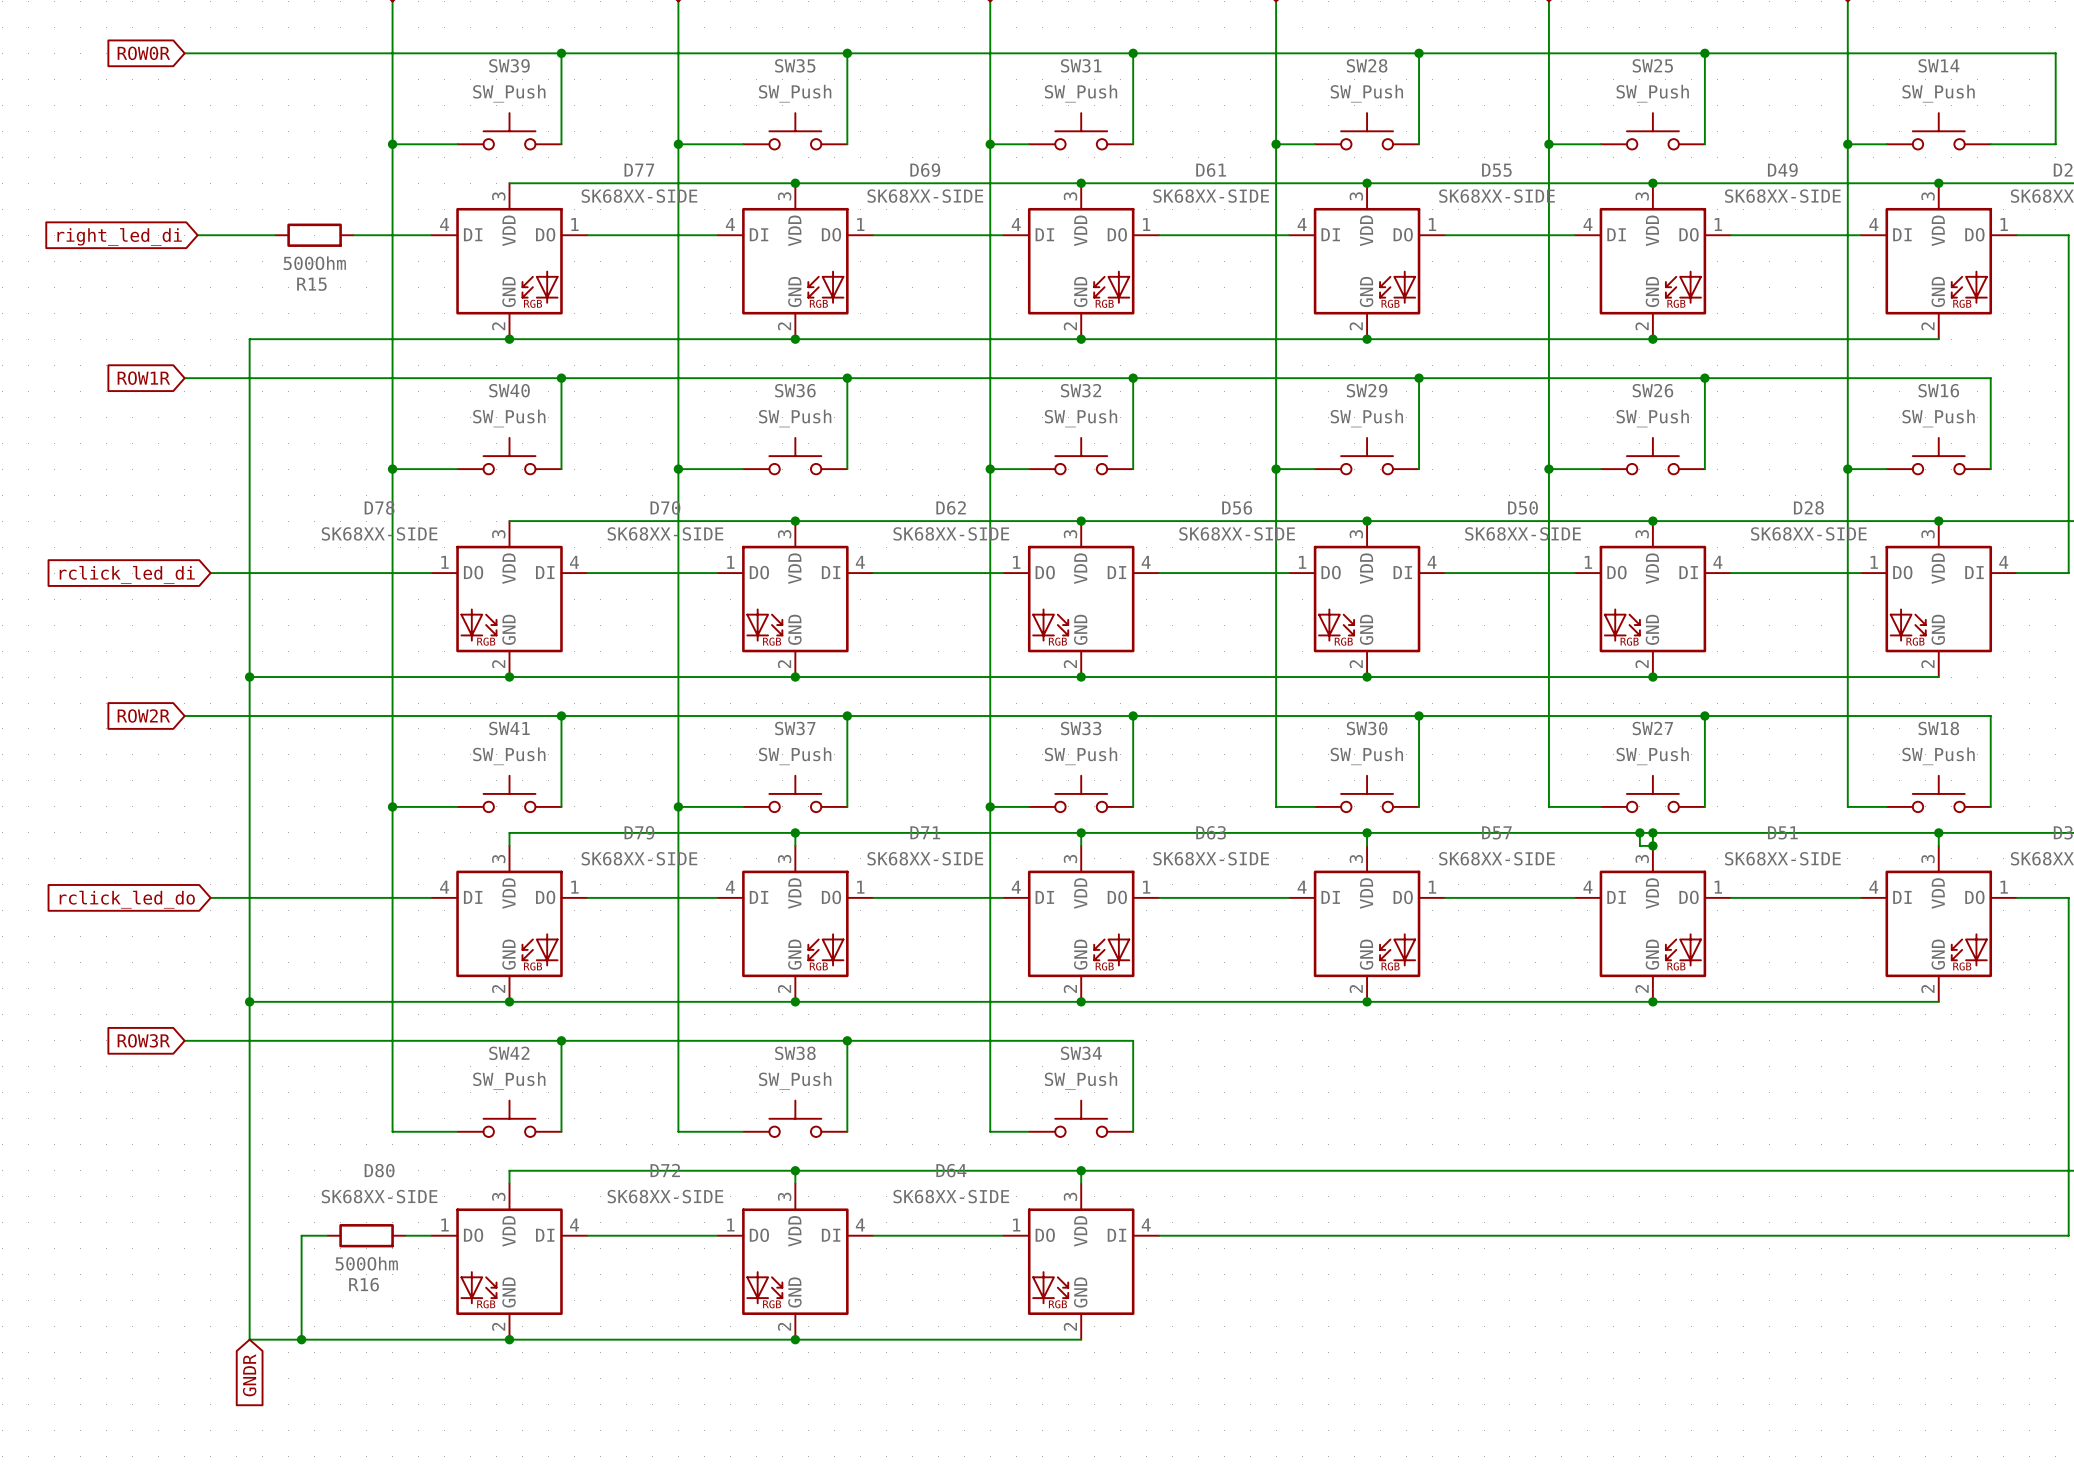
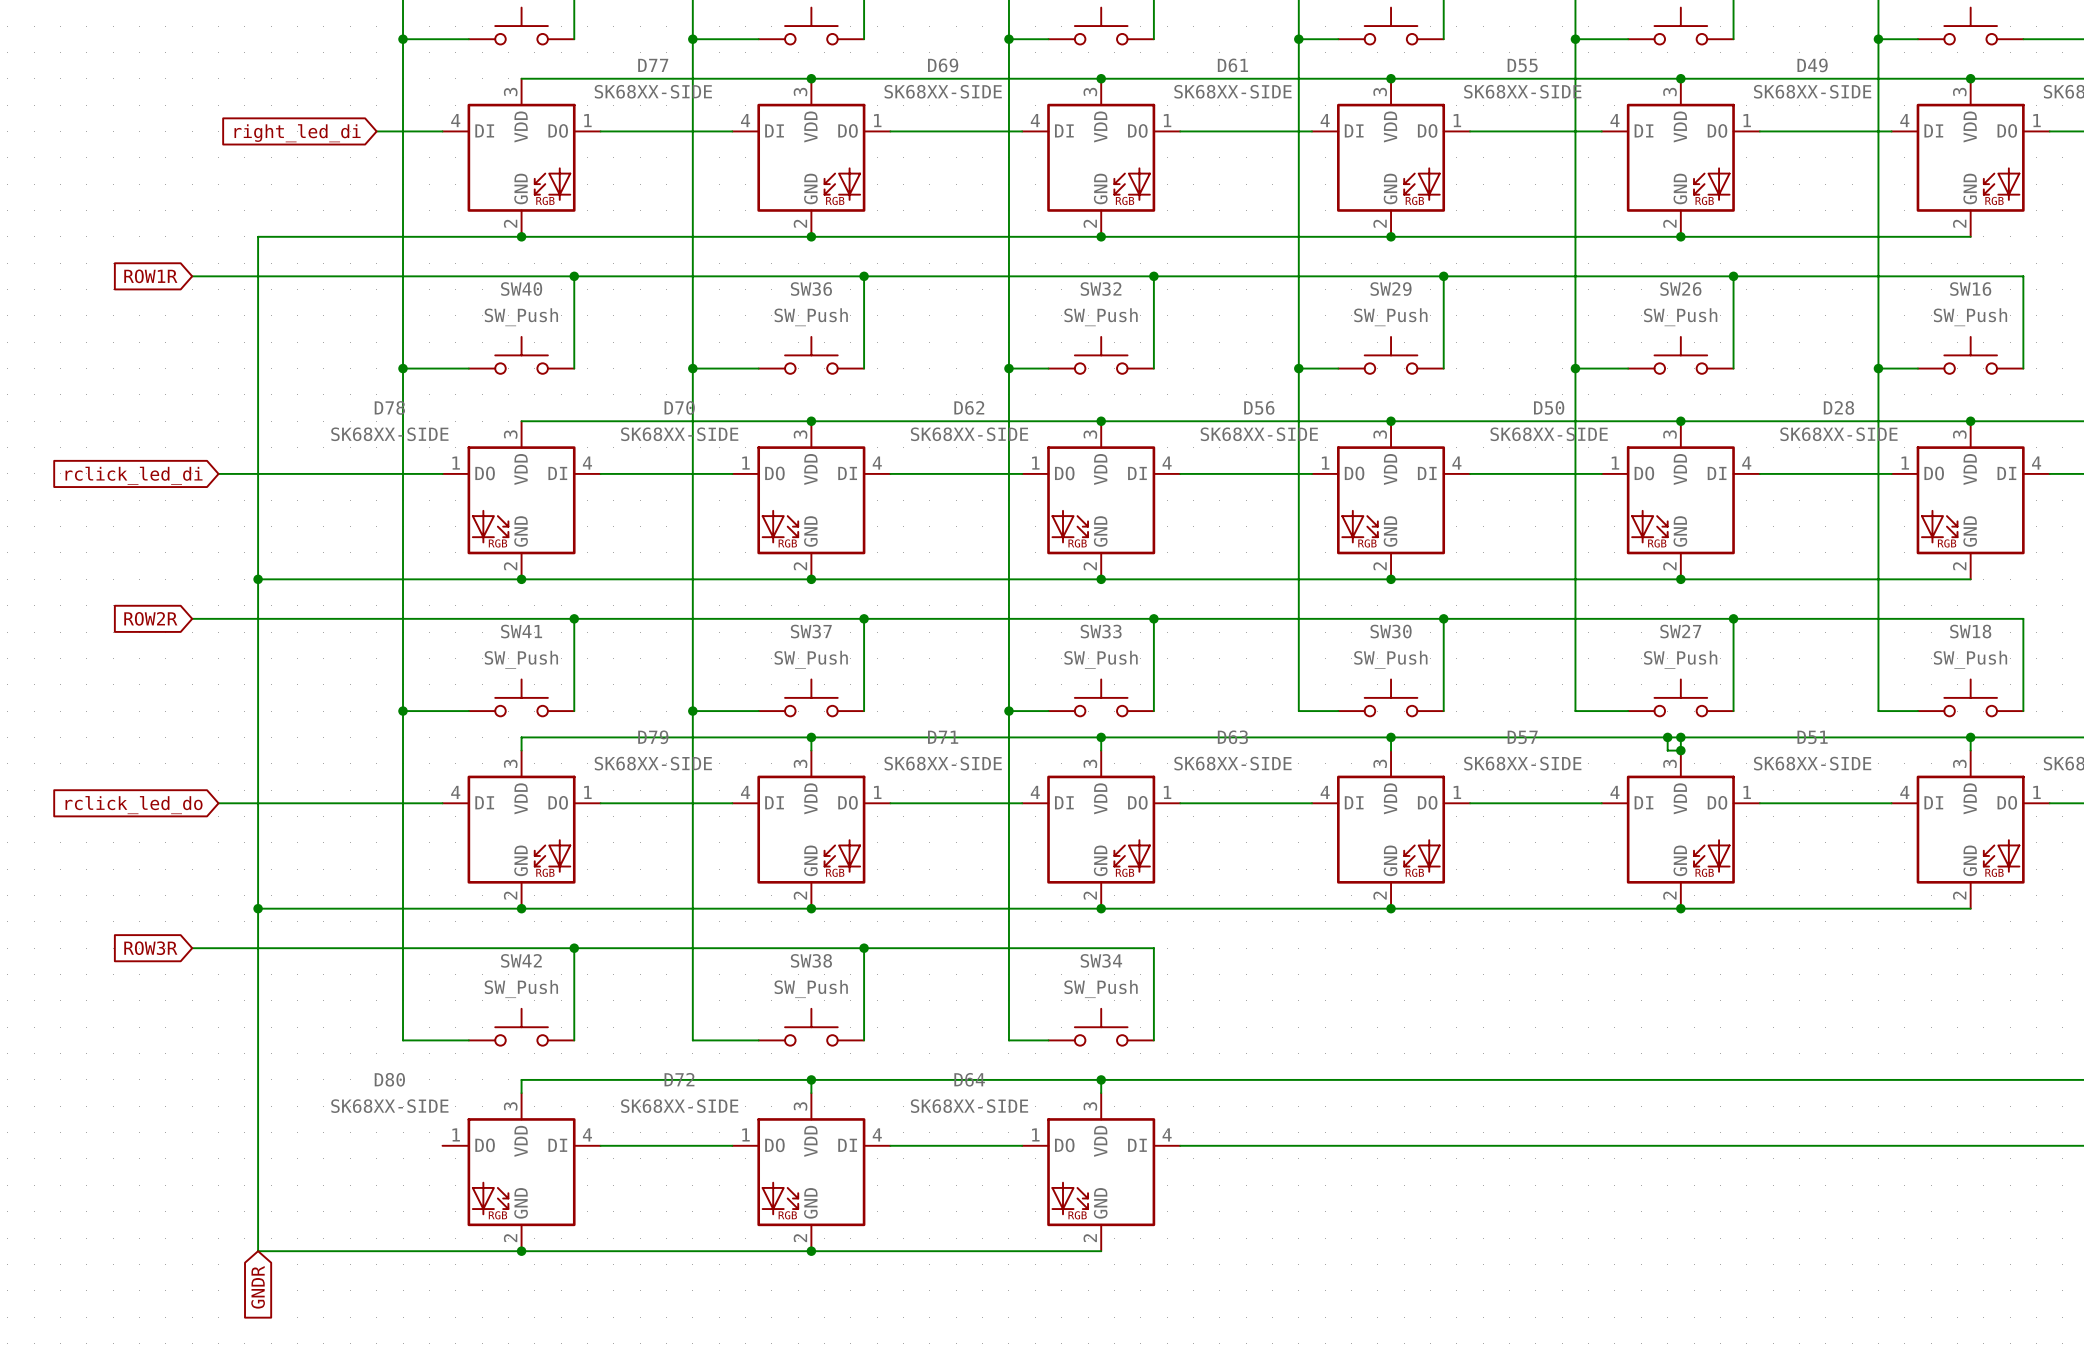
wire: (197, 235) (275, 235) -> none
R15: 500Ohm (314, 235) -> none
wire: (353, 235) (366, 235) -> none
global label position: right_led_di (119, 237) -> right_led_di (297, 133)
wire: (327, 1235) (301, 1235) (301, 1339) -> none
R16: 500Ohm (366, 1235) -> none
wire: (405, 1235) (431, 1235) -> none
junction: (301, 1339) -> none

